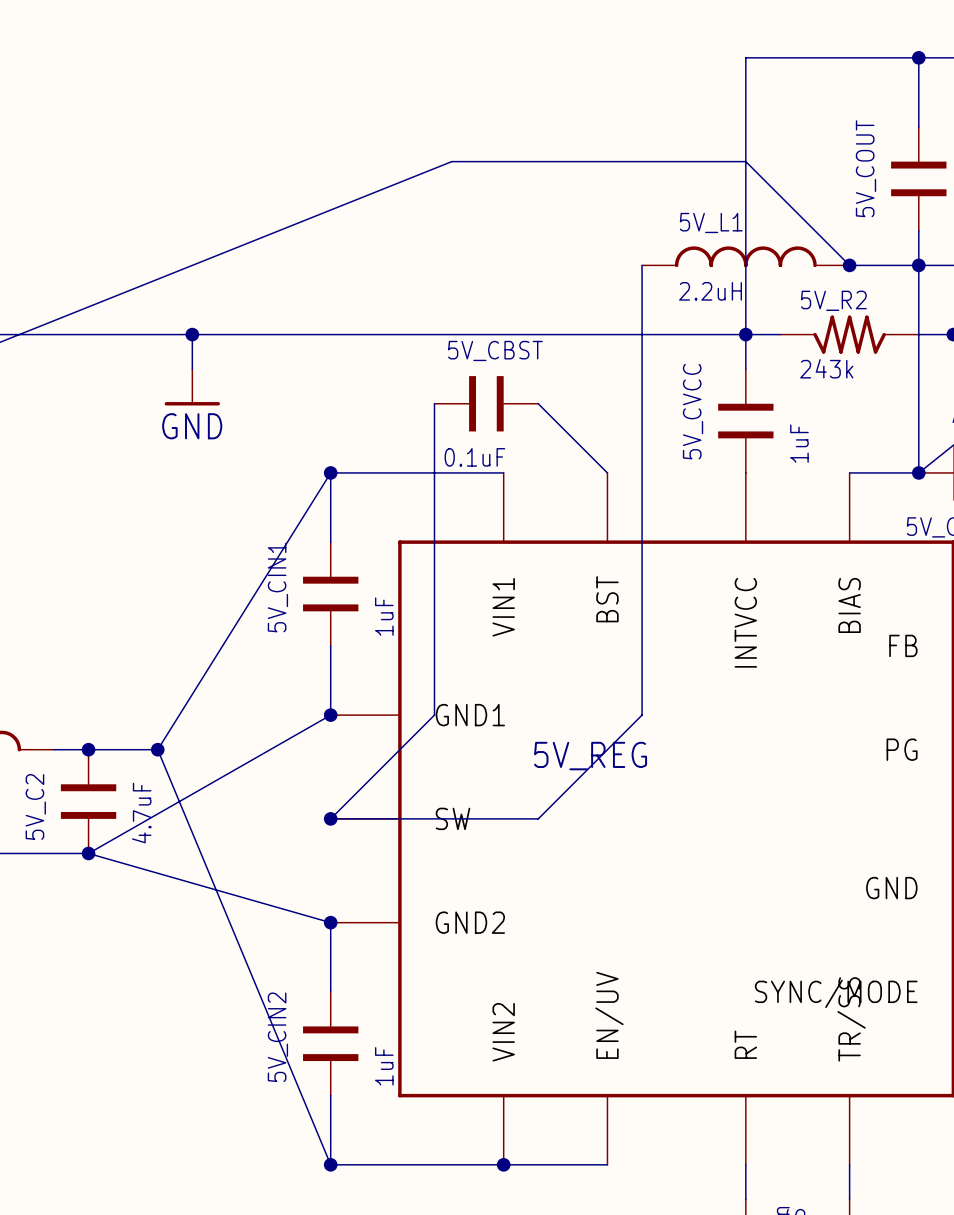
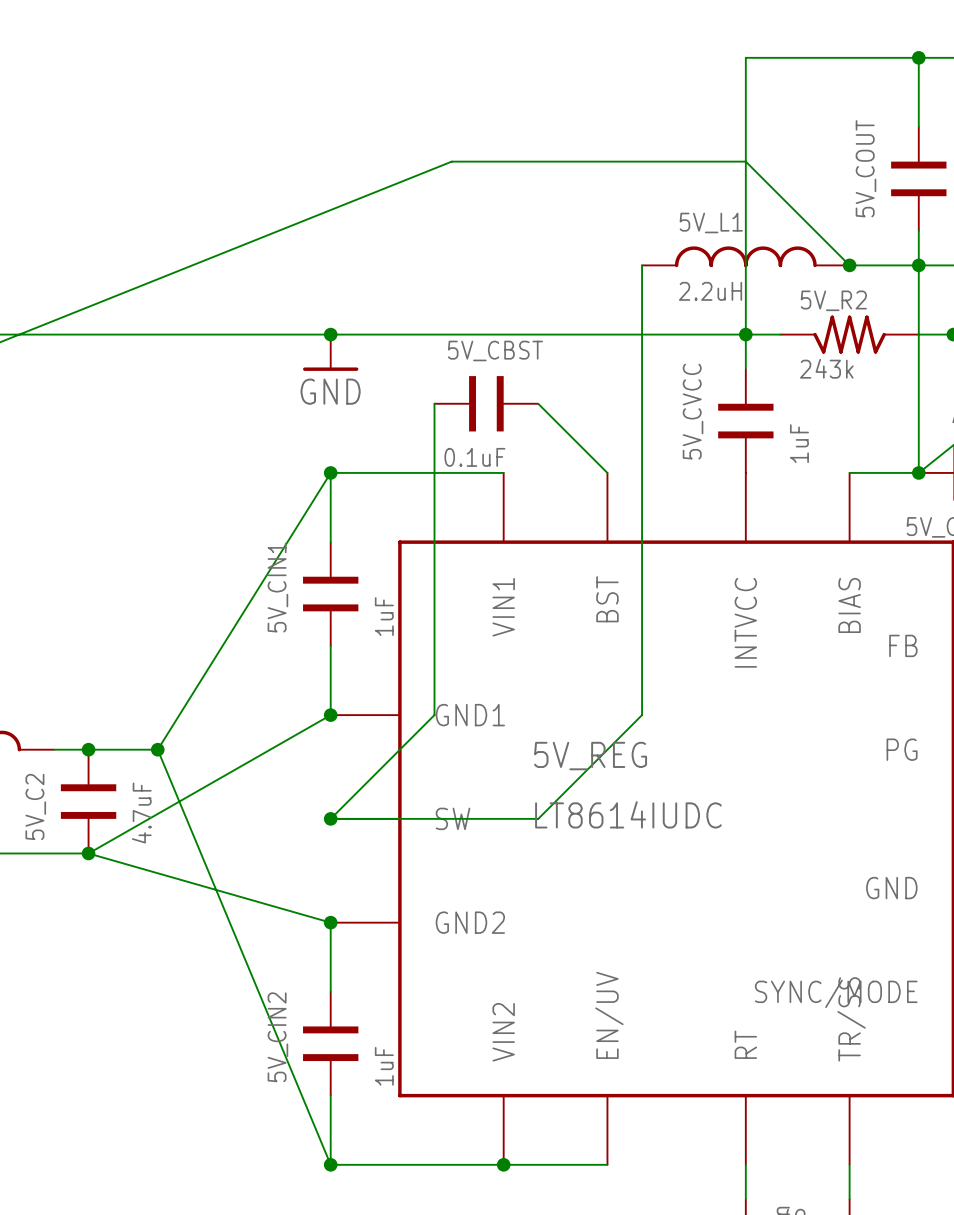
wire: (192, 334) (192, 369) -> none
junction: (192, 334) -> none
junction: none -> (330, 334)
power symbol position: GND (192, 387) -> GND (330, 352)
5V_REG value: none -> LT8614IUDC (628, 814)

